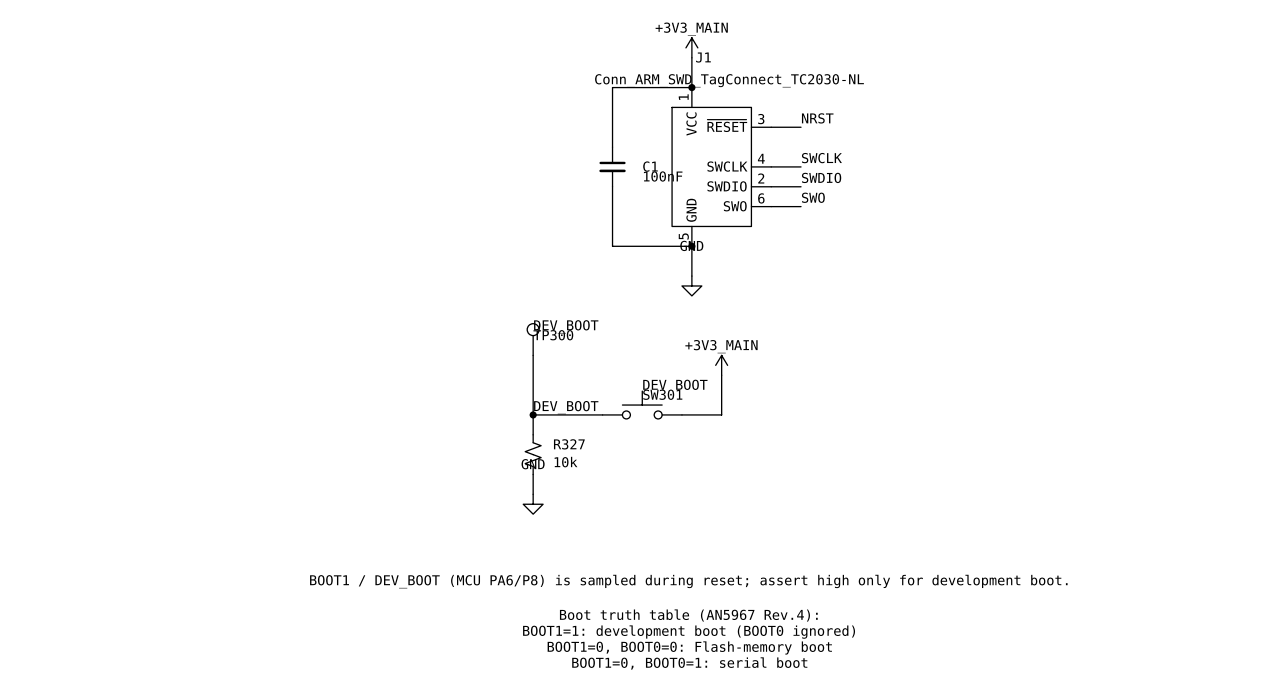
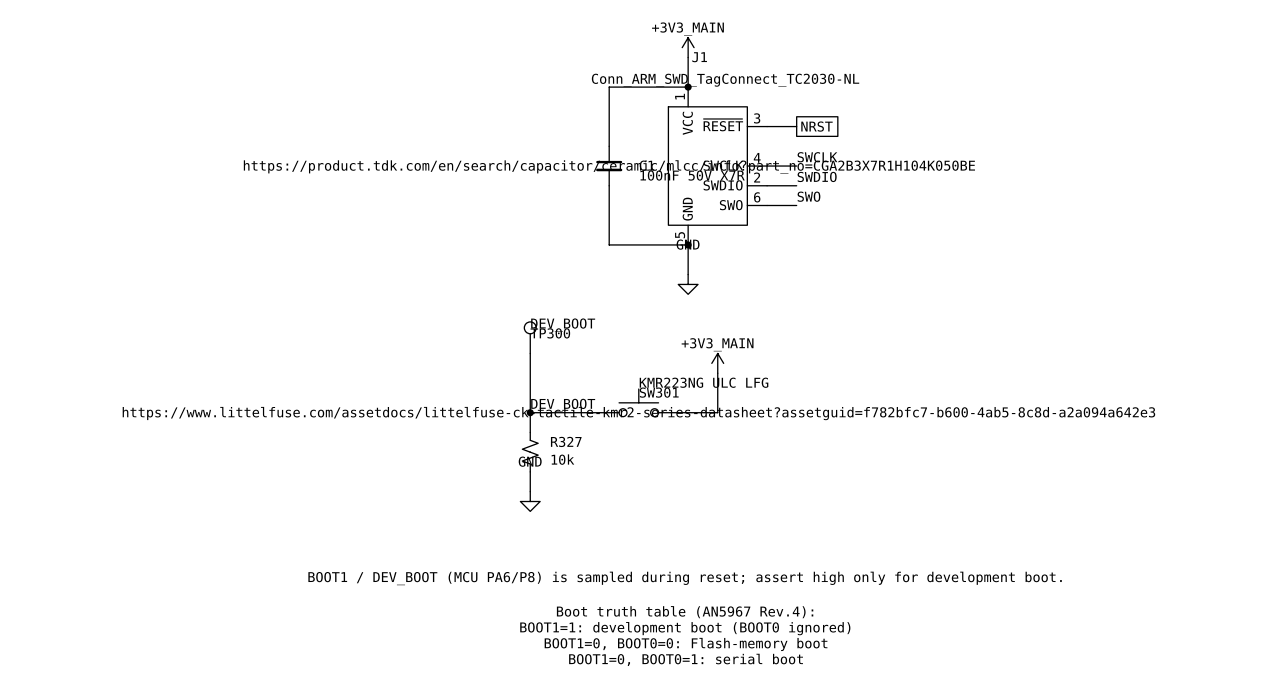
label: NRST (817, 118) -> none
global label: none -> NRST (816, 126)
C1 text: none -> https://product.tdk.com/en/search/capacitor/ceramic/mlcc/info?part_no=CGA2B3X7R1H104K050BE (609, 167)
C1 value: 100nF (663, 176) -> 100nF 50V X7R (692, 175)
SW301 value: DEV BOOT (675, 384) -> KMR223NG ULC LFG (704, 382)
SW301 text: none -> https://www.littelfuse.com/assetdocs/littelfuse-ck-tactile-kmr2-series-datasheet?assetguid=f782bfc7-b600-4ab5-8c8d-a2a094a642e3 (638, 413)

